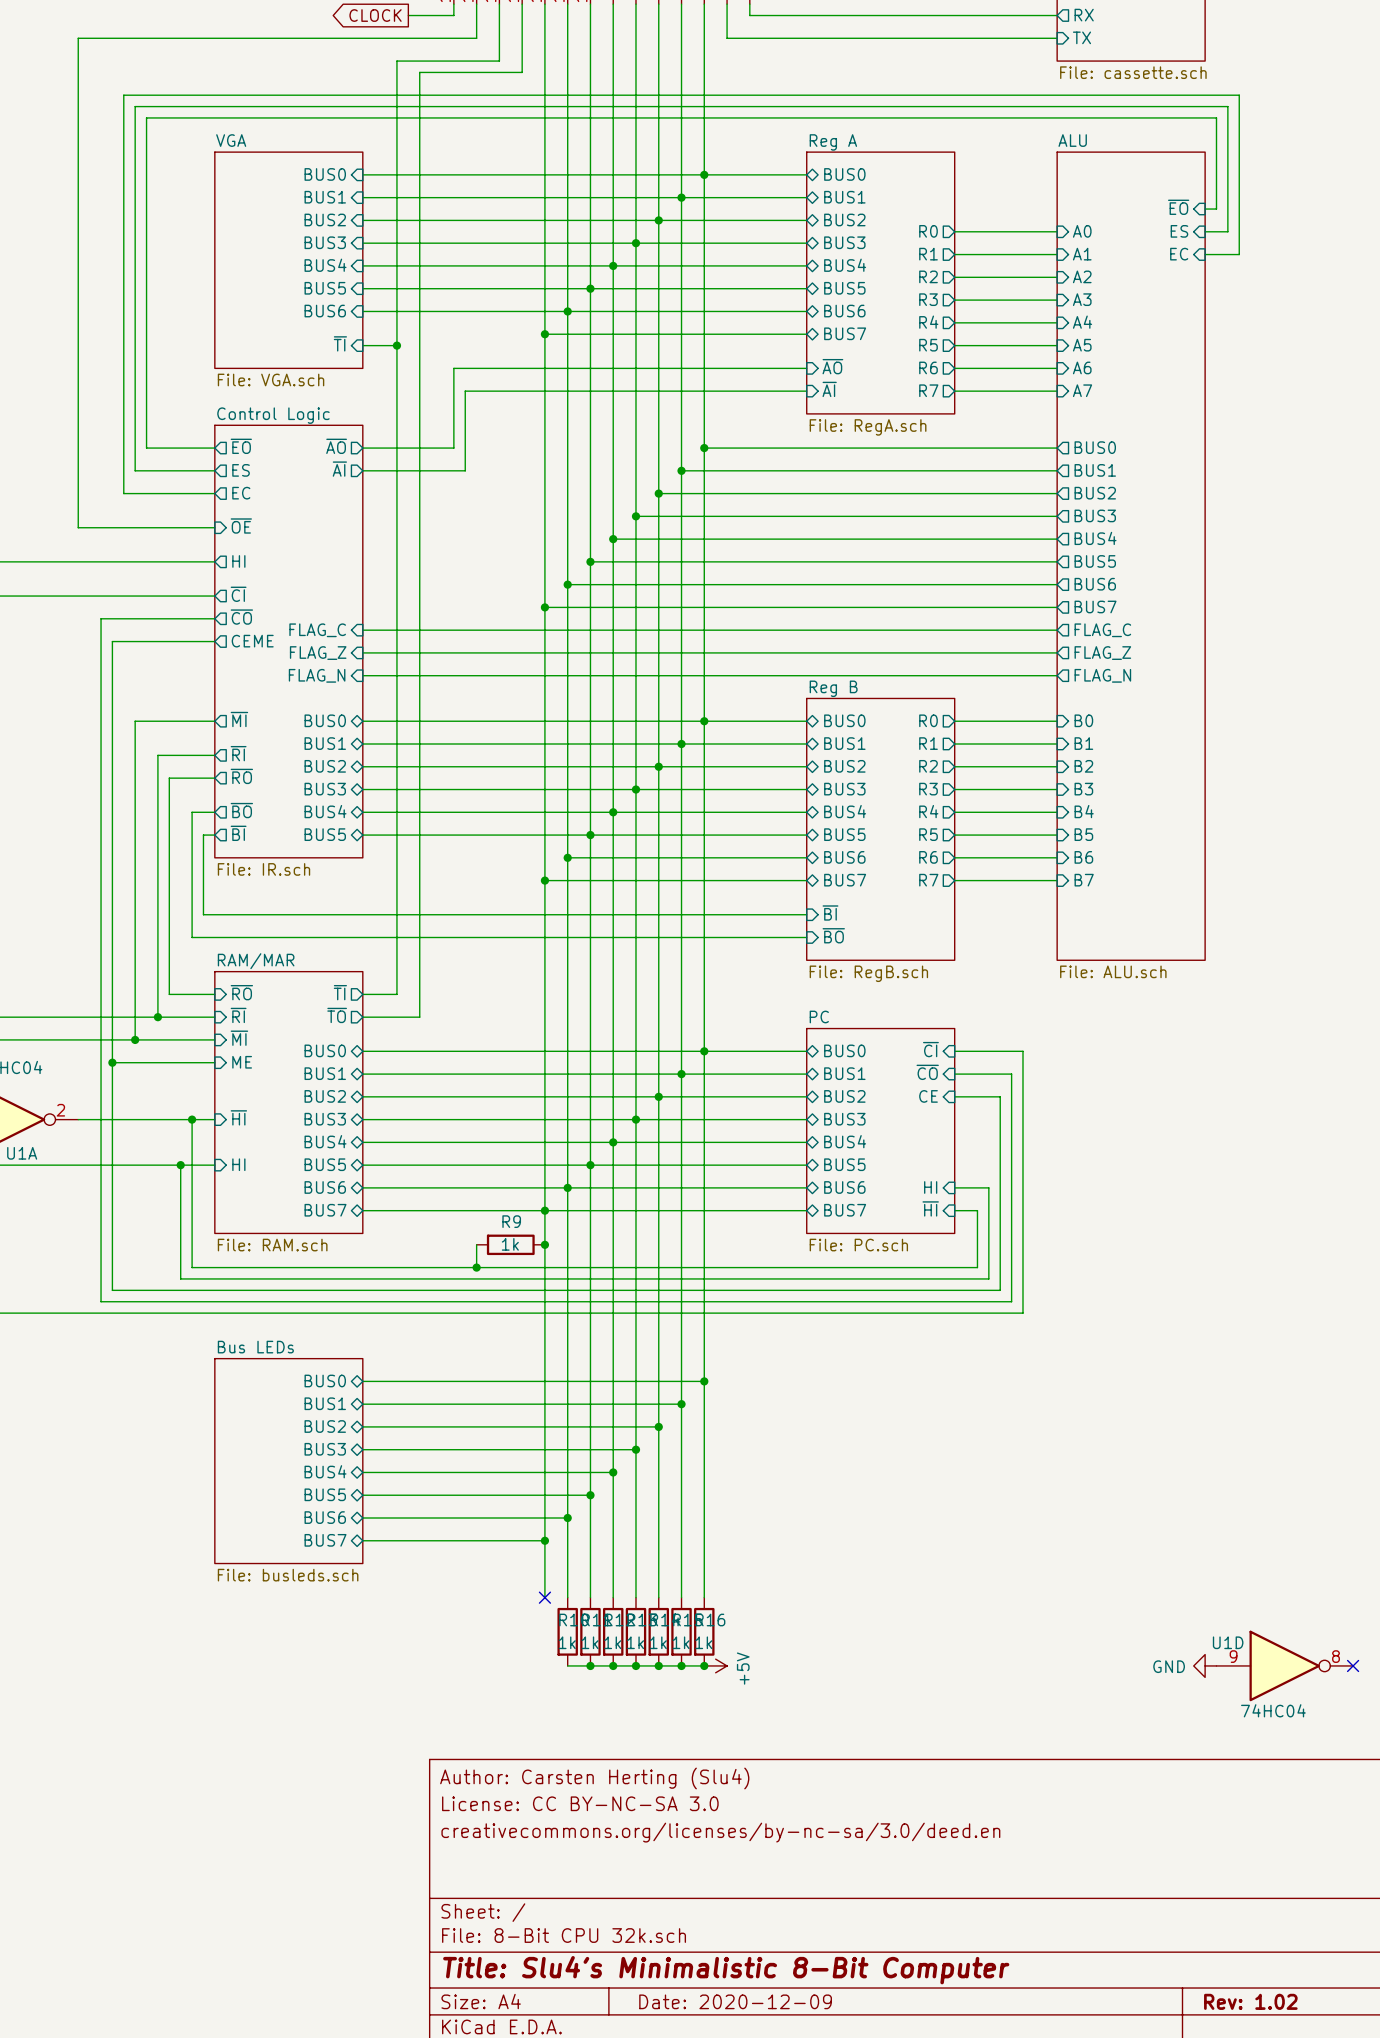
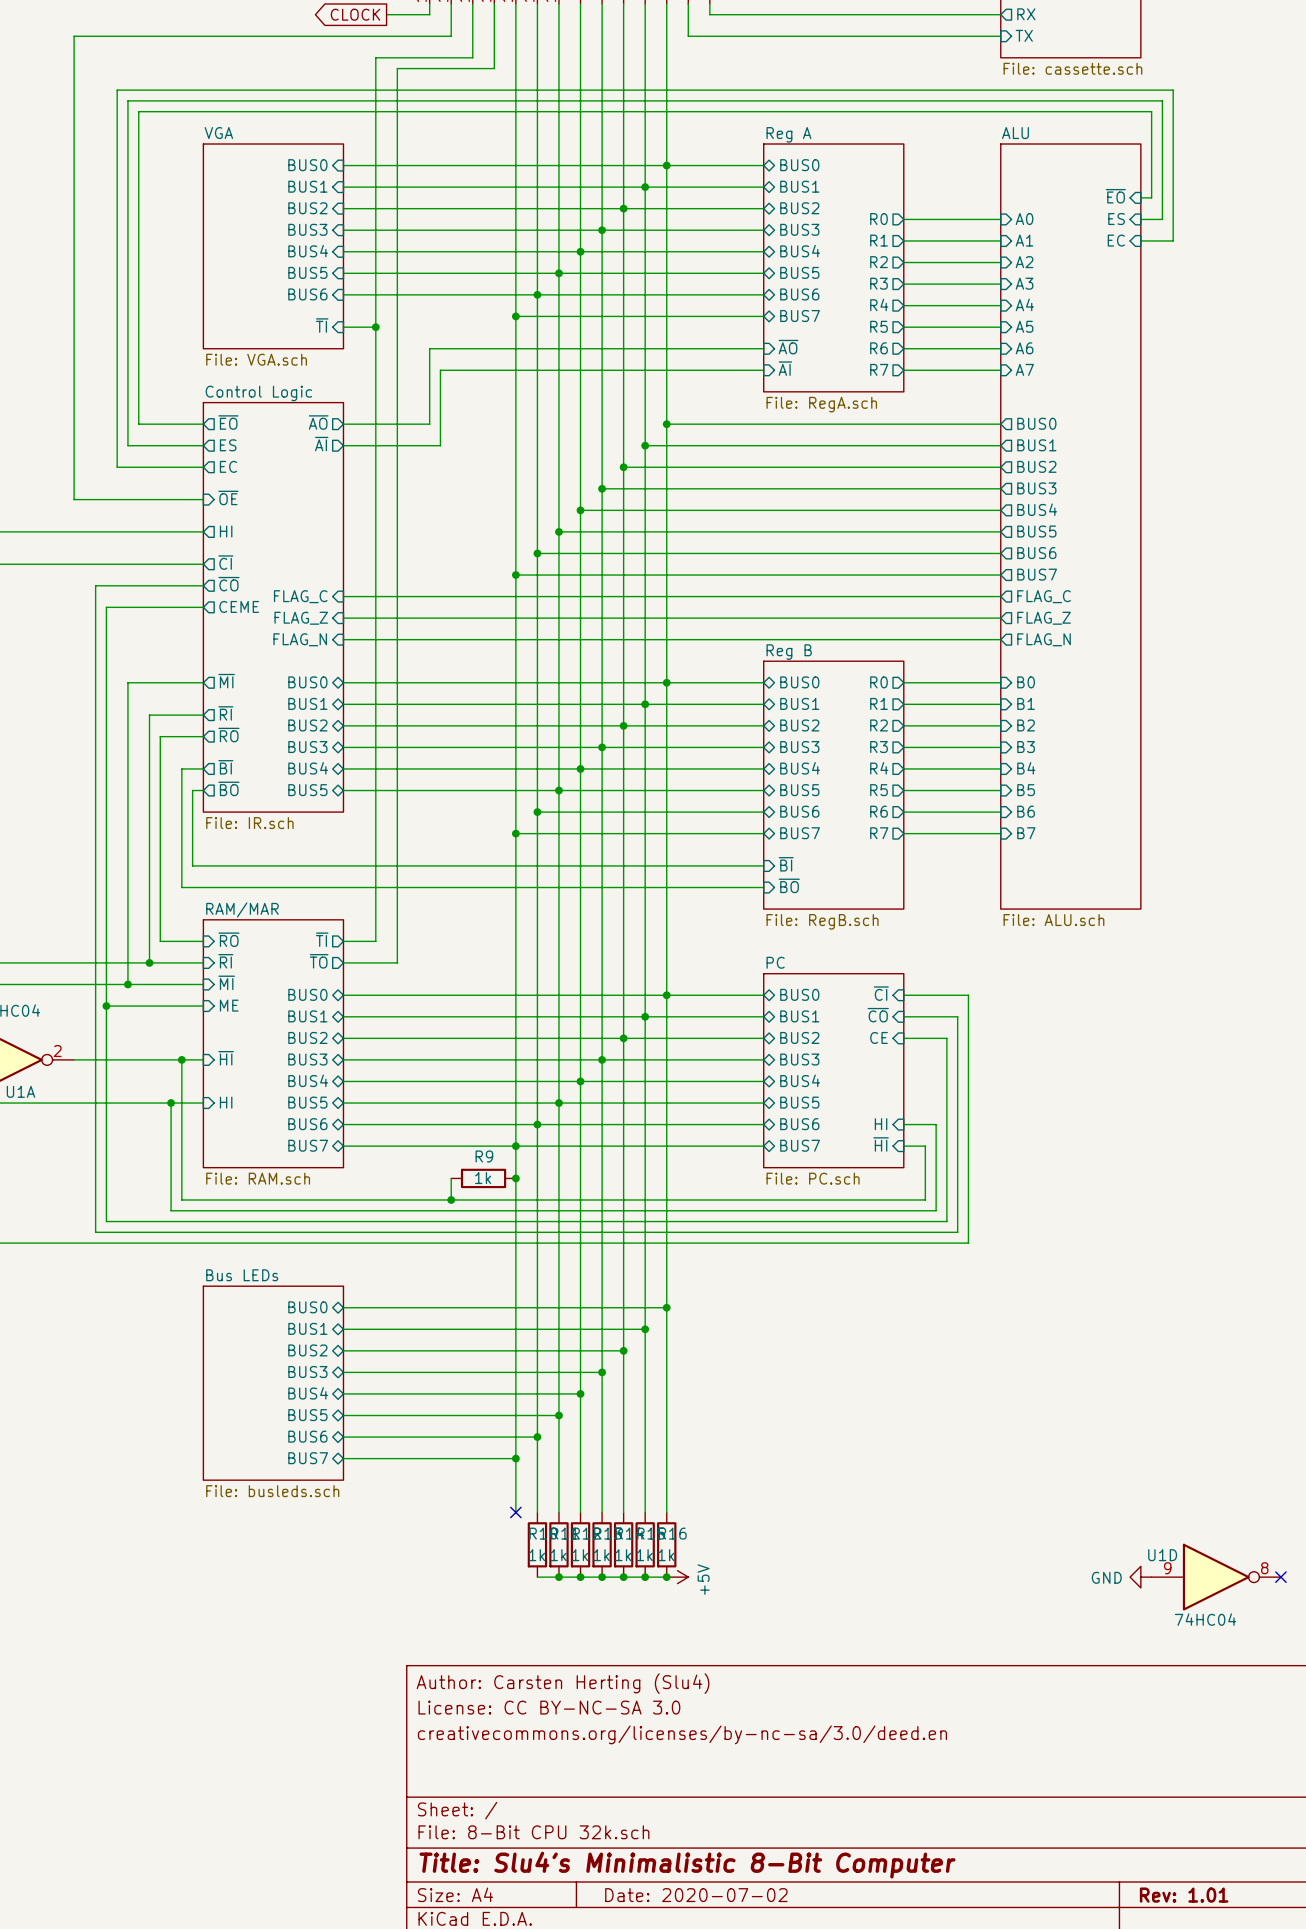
sheet pin: ~{BO} (241, 810) -> ~{BI} (225, 767)
sheet pin: ~{BI} (238, 833) -> ~{BO} (228, 788)
title block: Date: 2020-12-09 (735, 2001) -> Date: 2020-07-02 (696, 1895)
title block: Rev: 1.02 (1250, 2001) -> Rev: 1.01 (1184, 1895)

